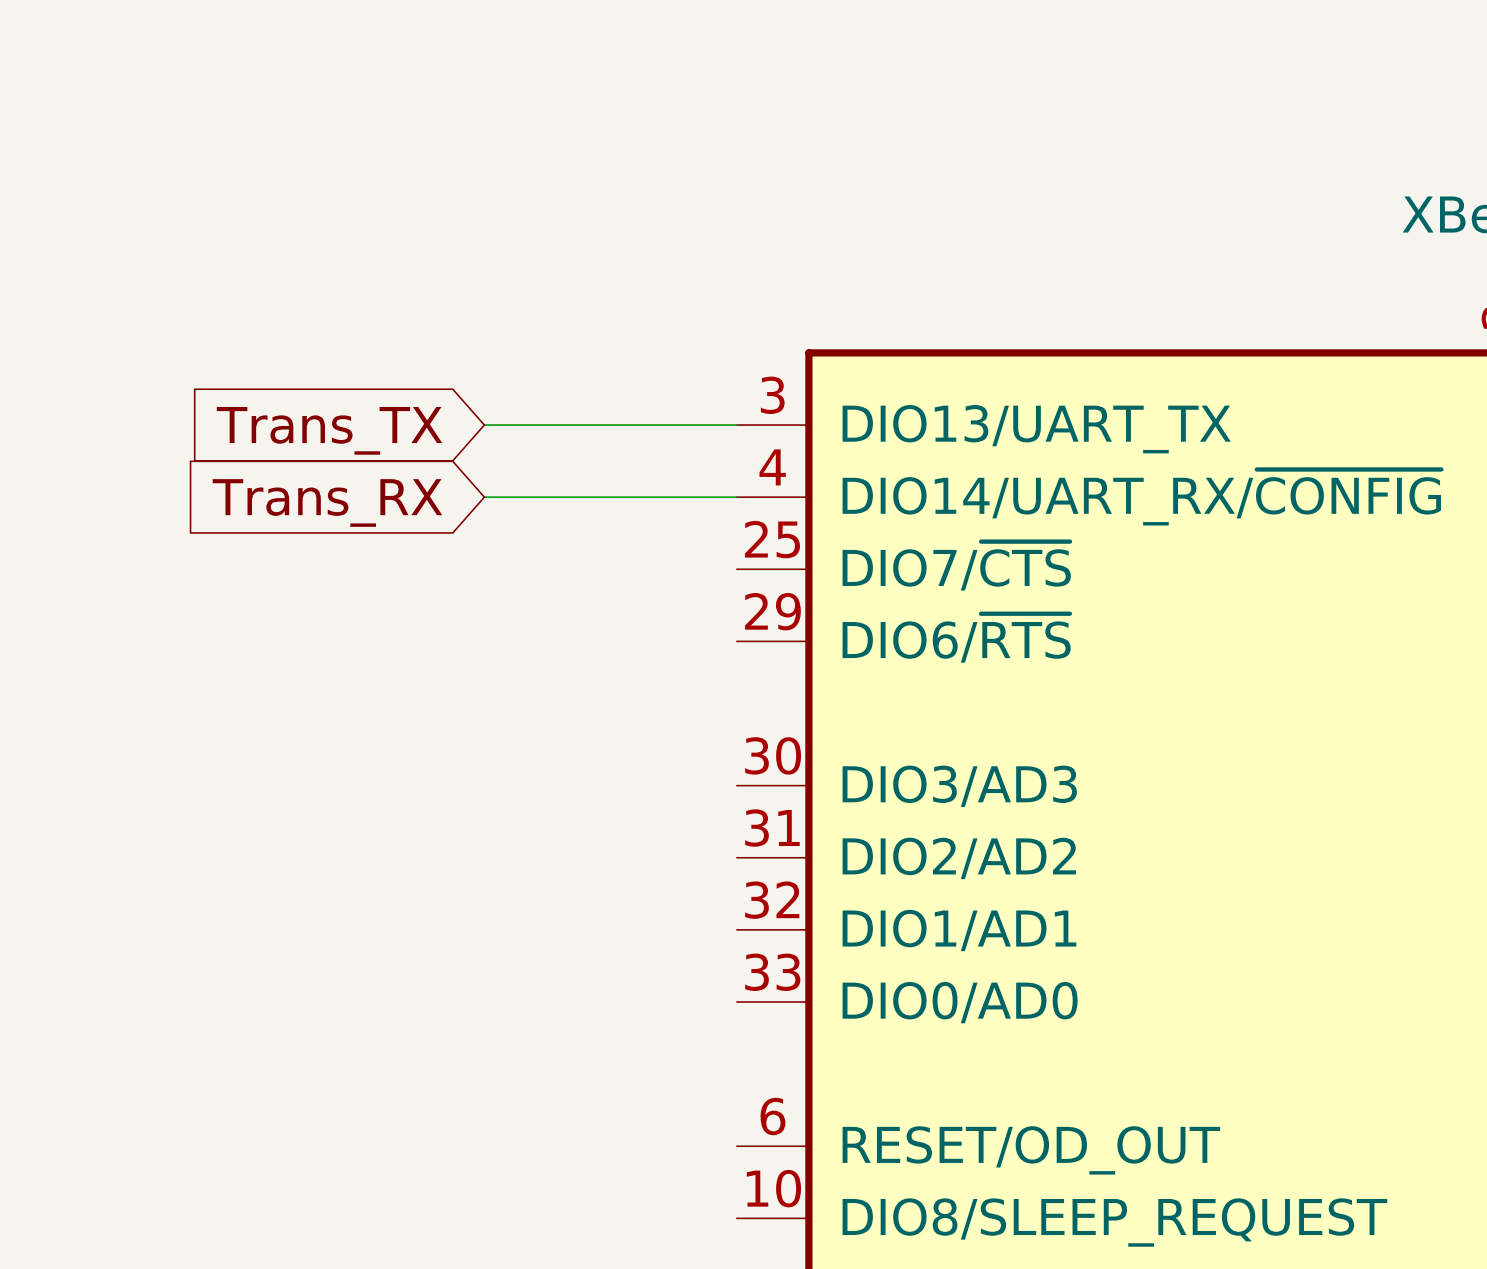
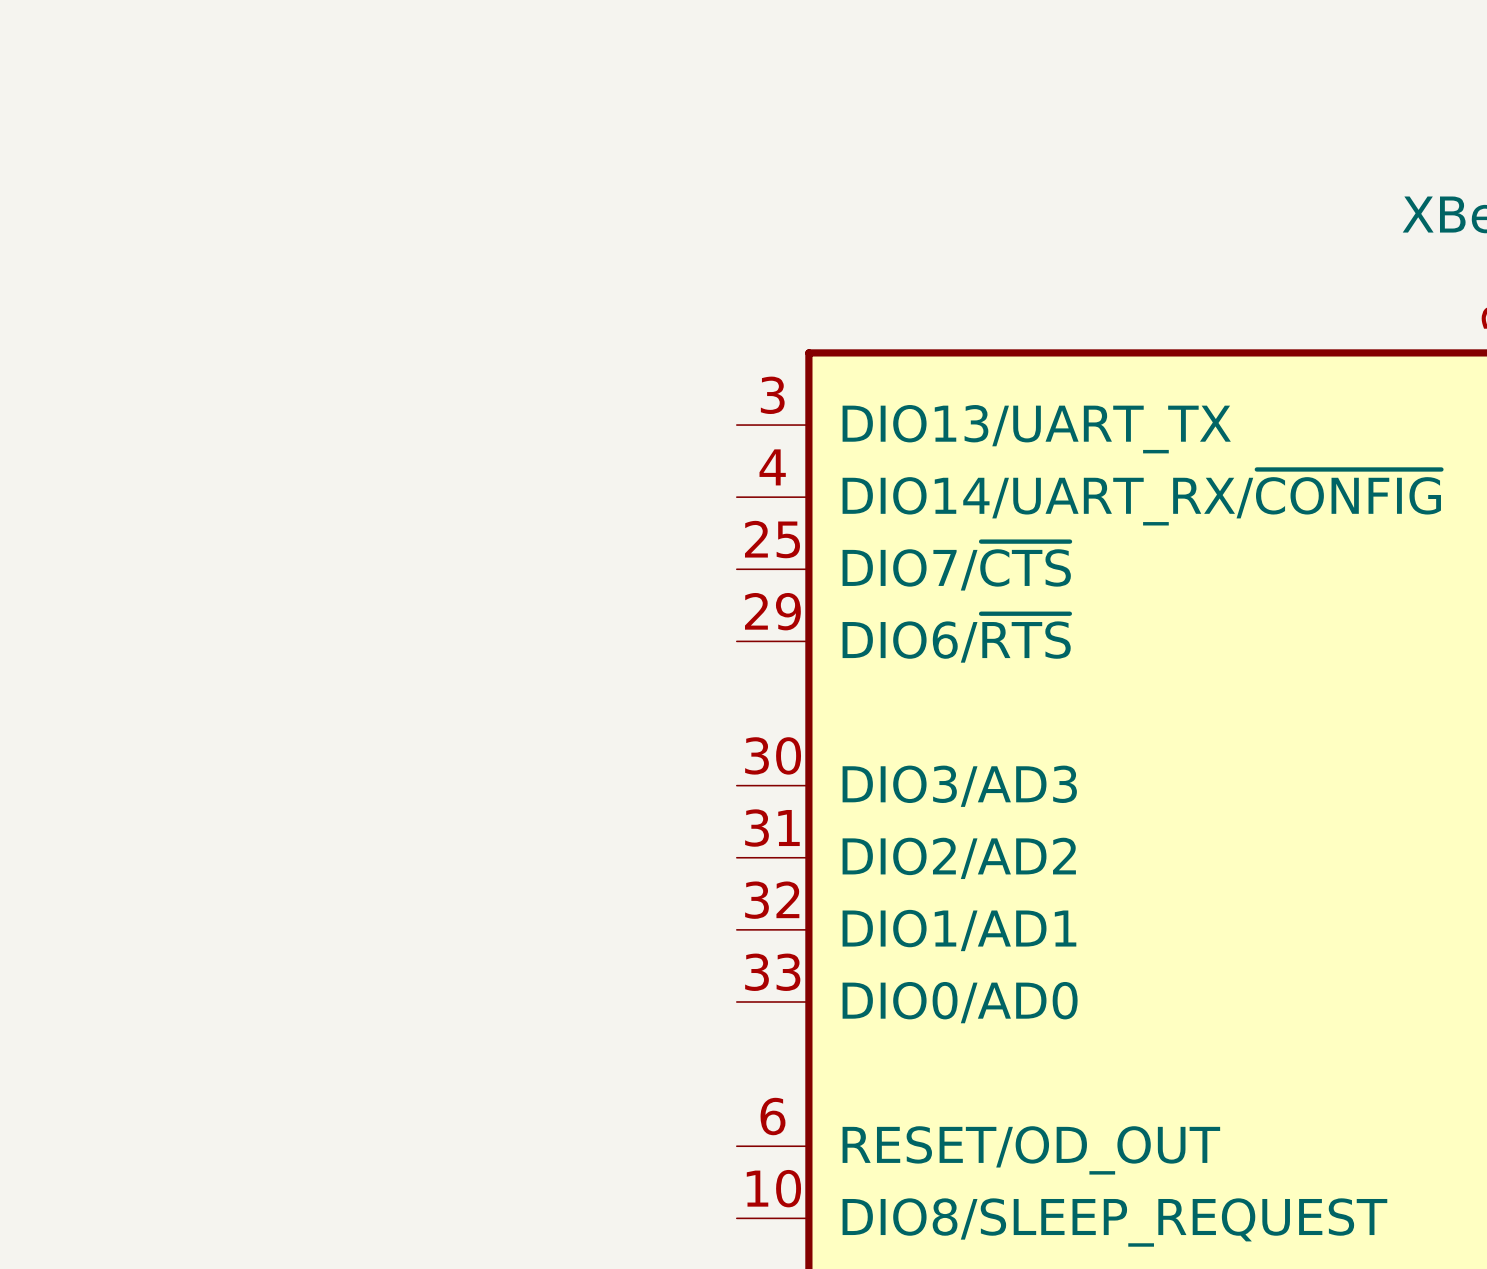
wire: (484, 425) (736, 425) -> none
global label: Trans_TX (329, 430) -> none
wire: (484, 497) (736, 497) -> none
global label: Trans_RX (327, 502) -> none

